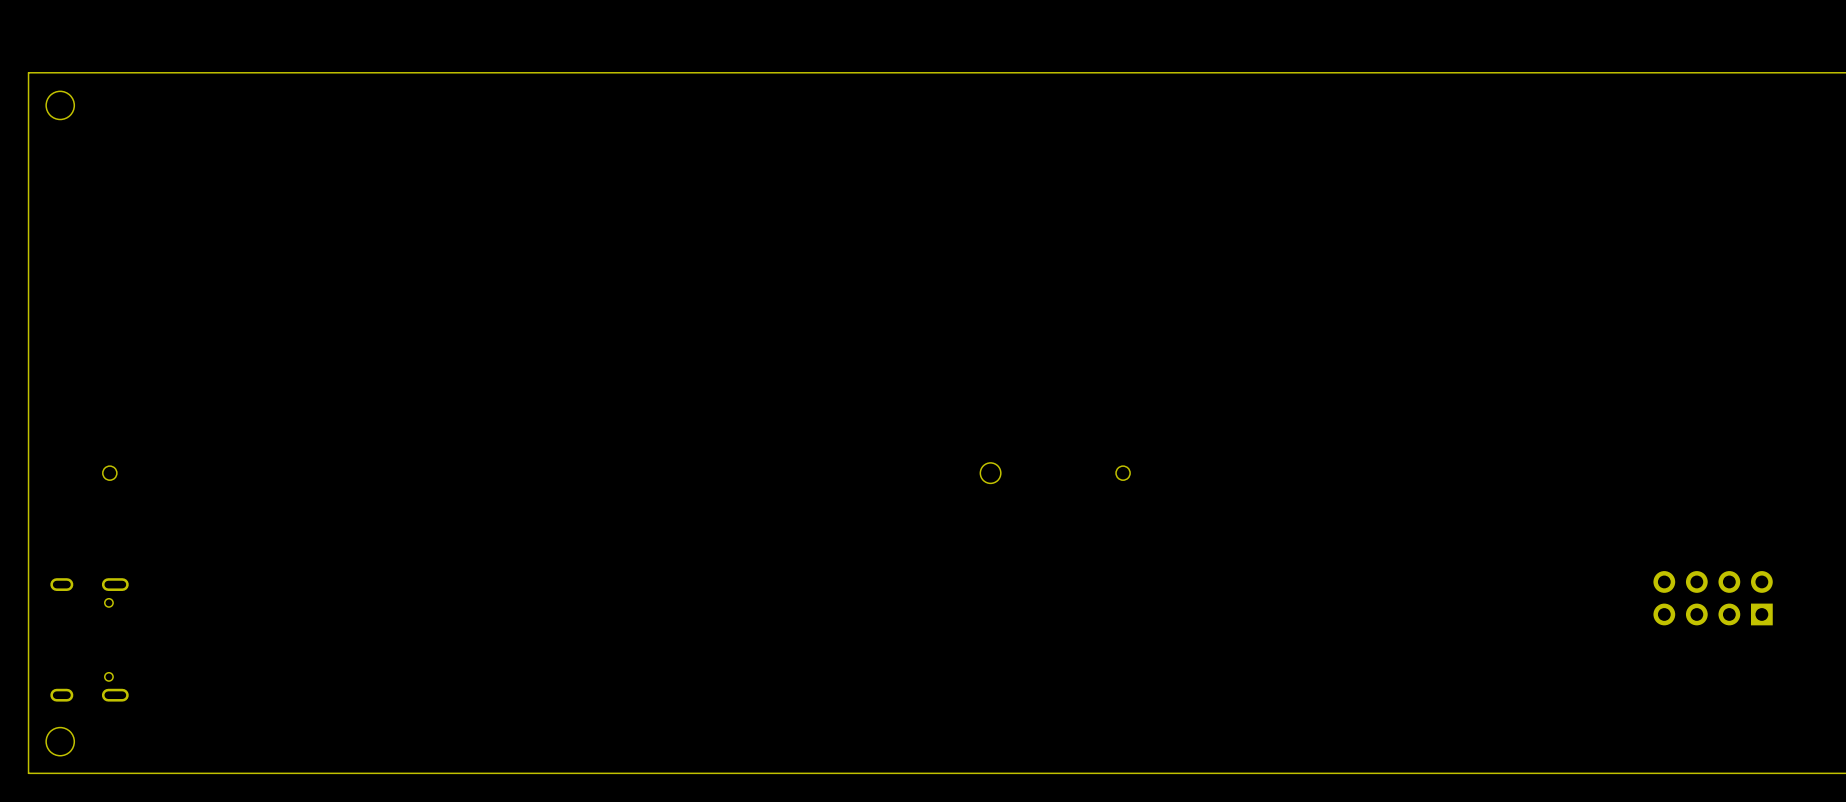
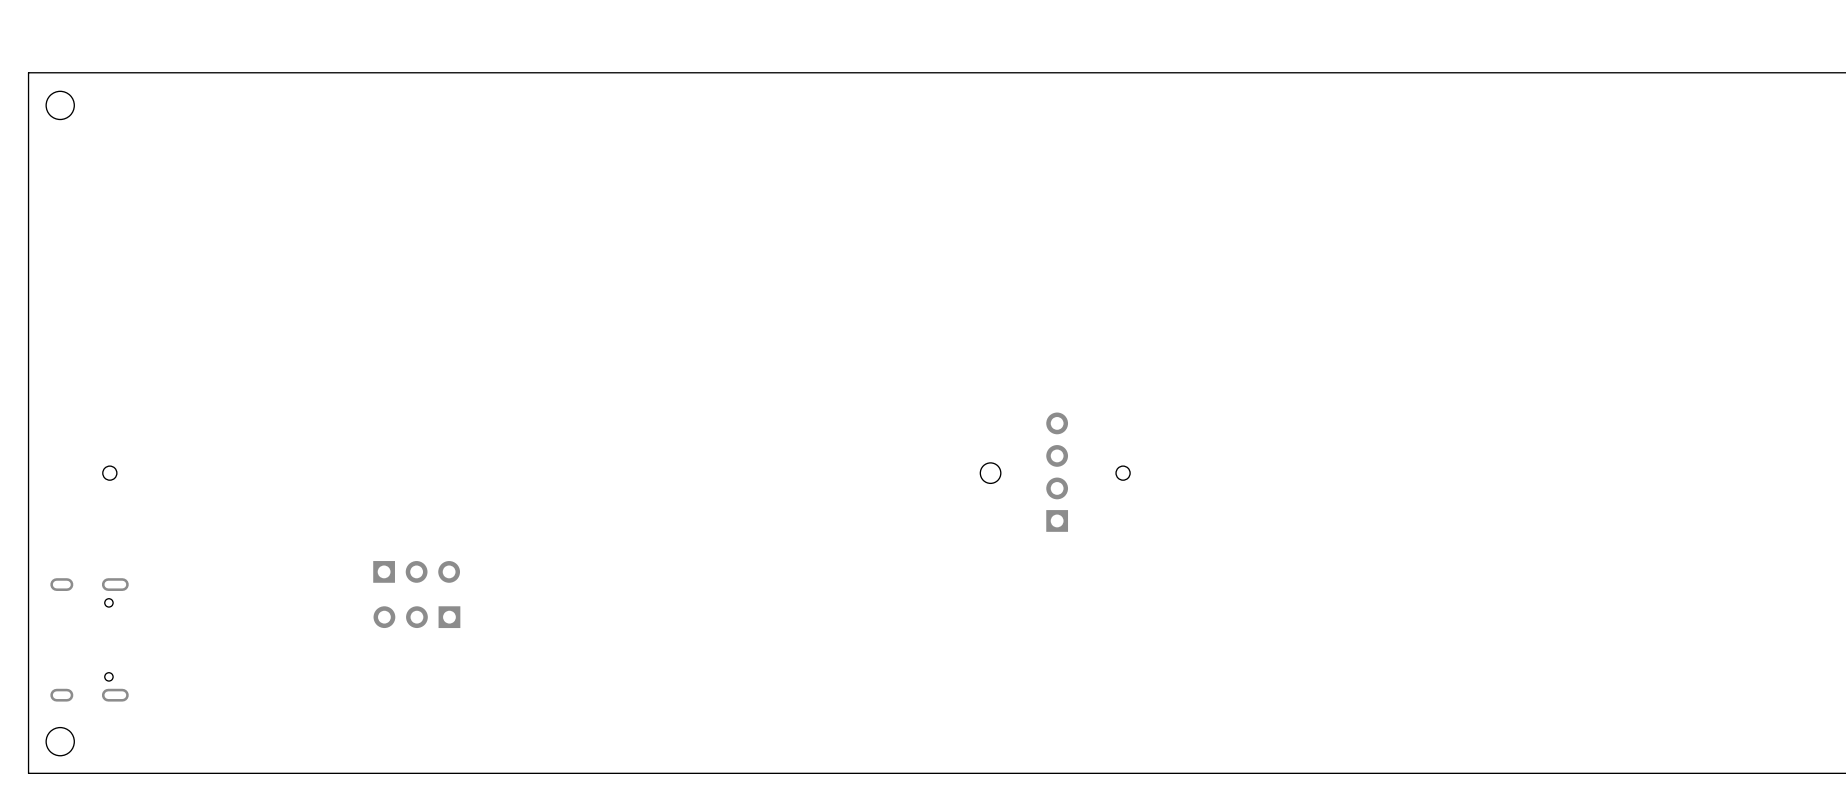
part: none -> (1057, 472)
part: none -> (416, 571)
part: (1713, 598) -> none
part: none -> (416, 617)

